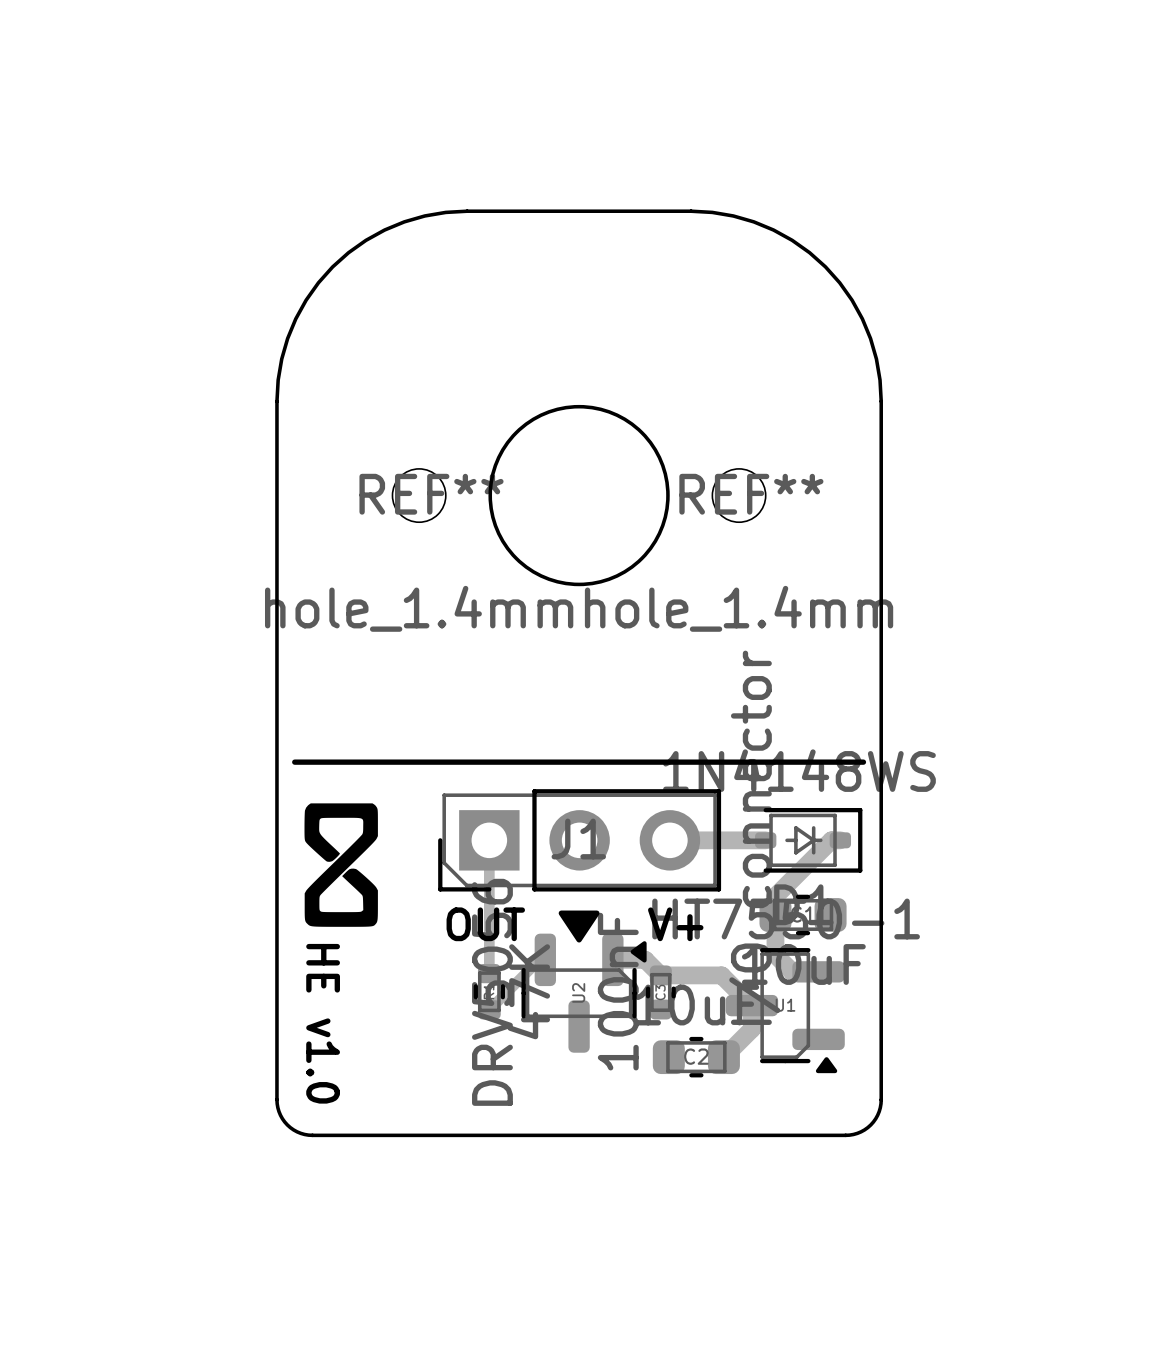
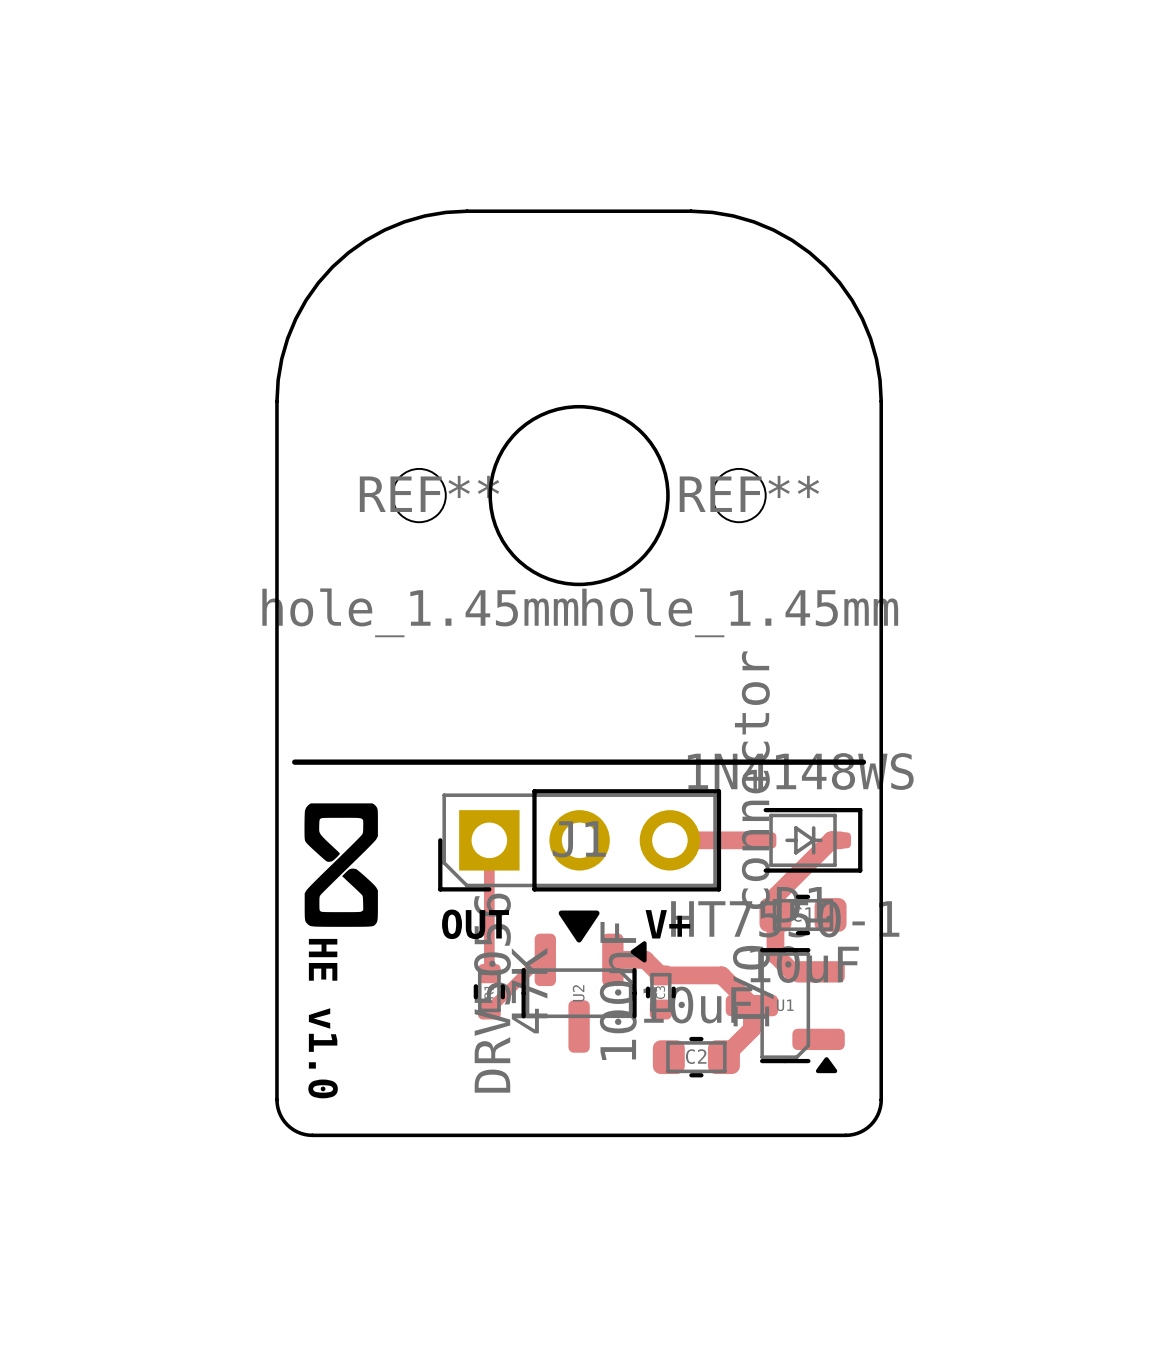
REF** value: hole_1.4mm (419, 608) -> hole_1.45mm (420, 612)
REF** value: hole_1.4mm (739, 608) -> hole_1.45mm (740, 612)

